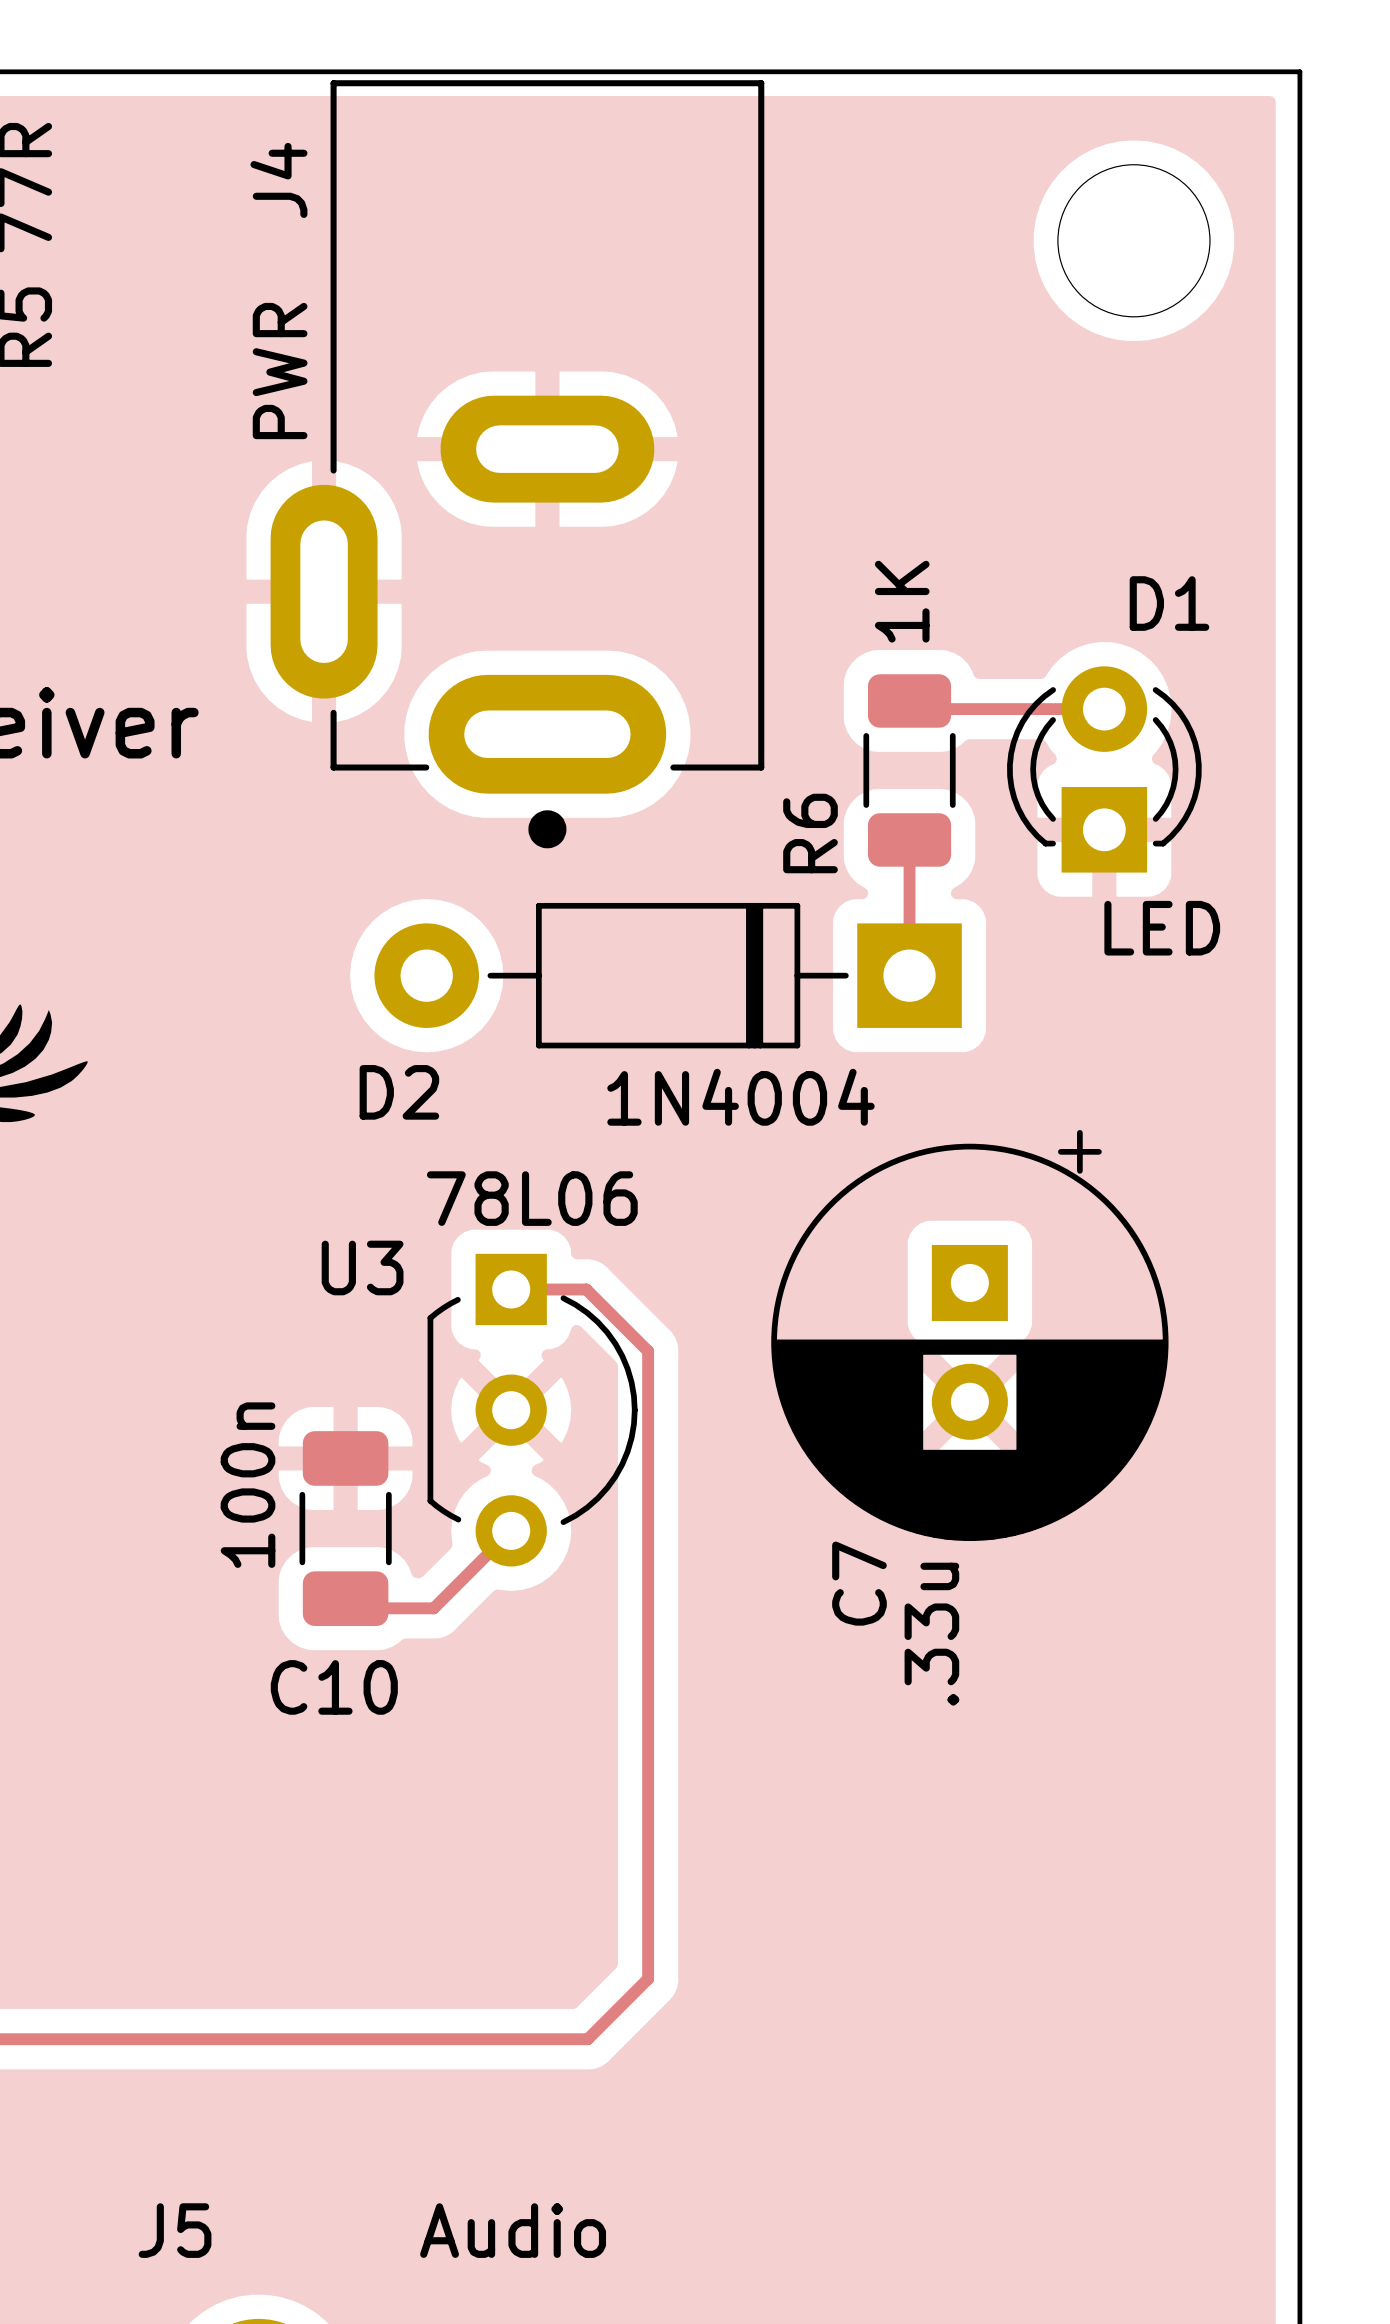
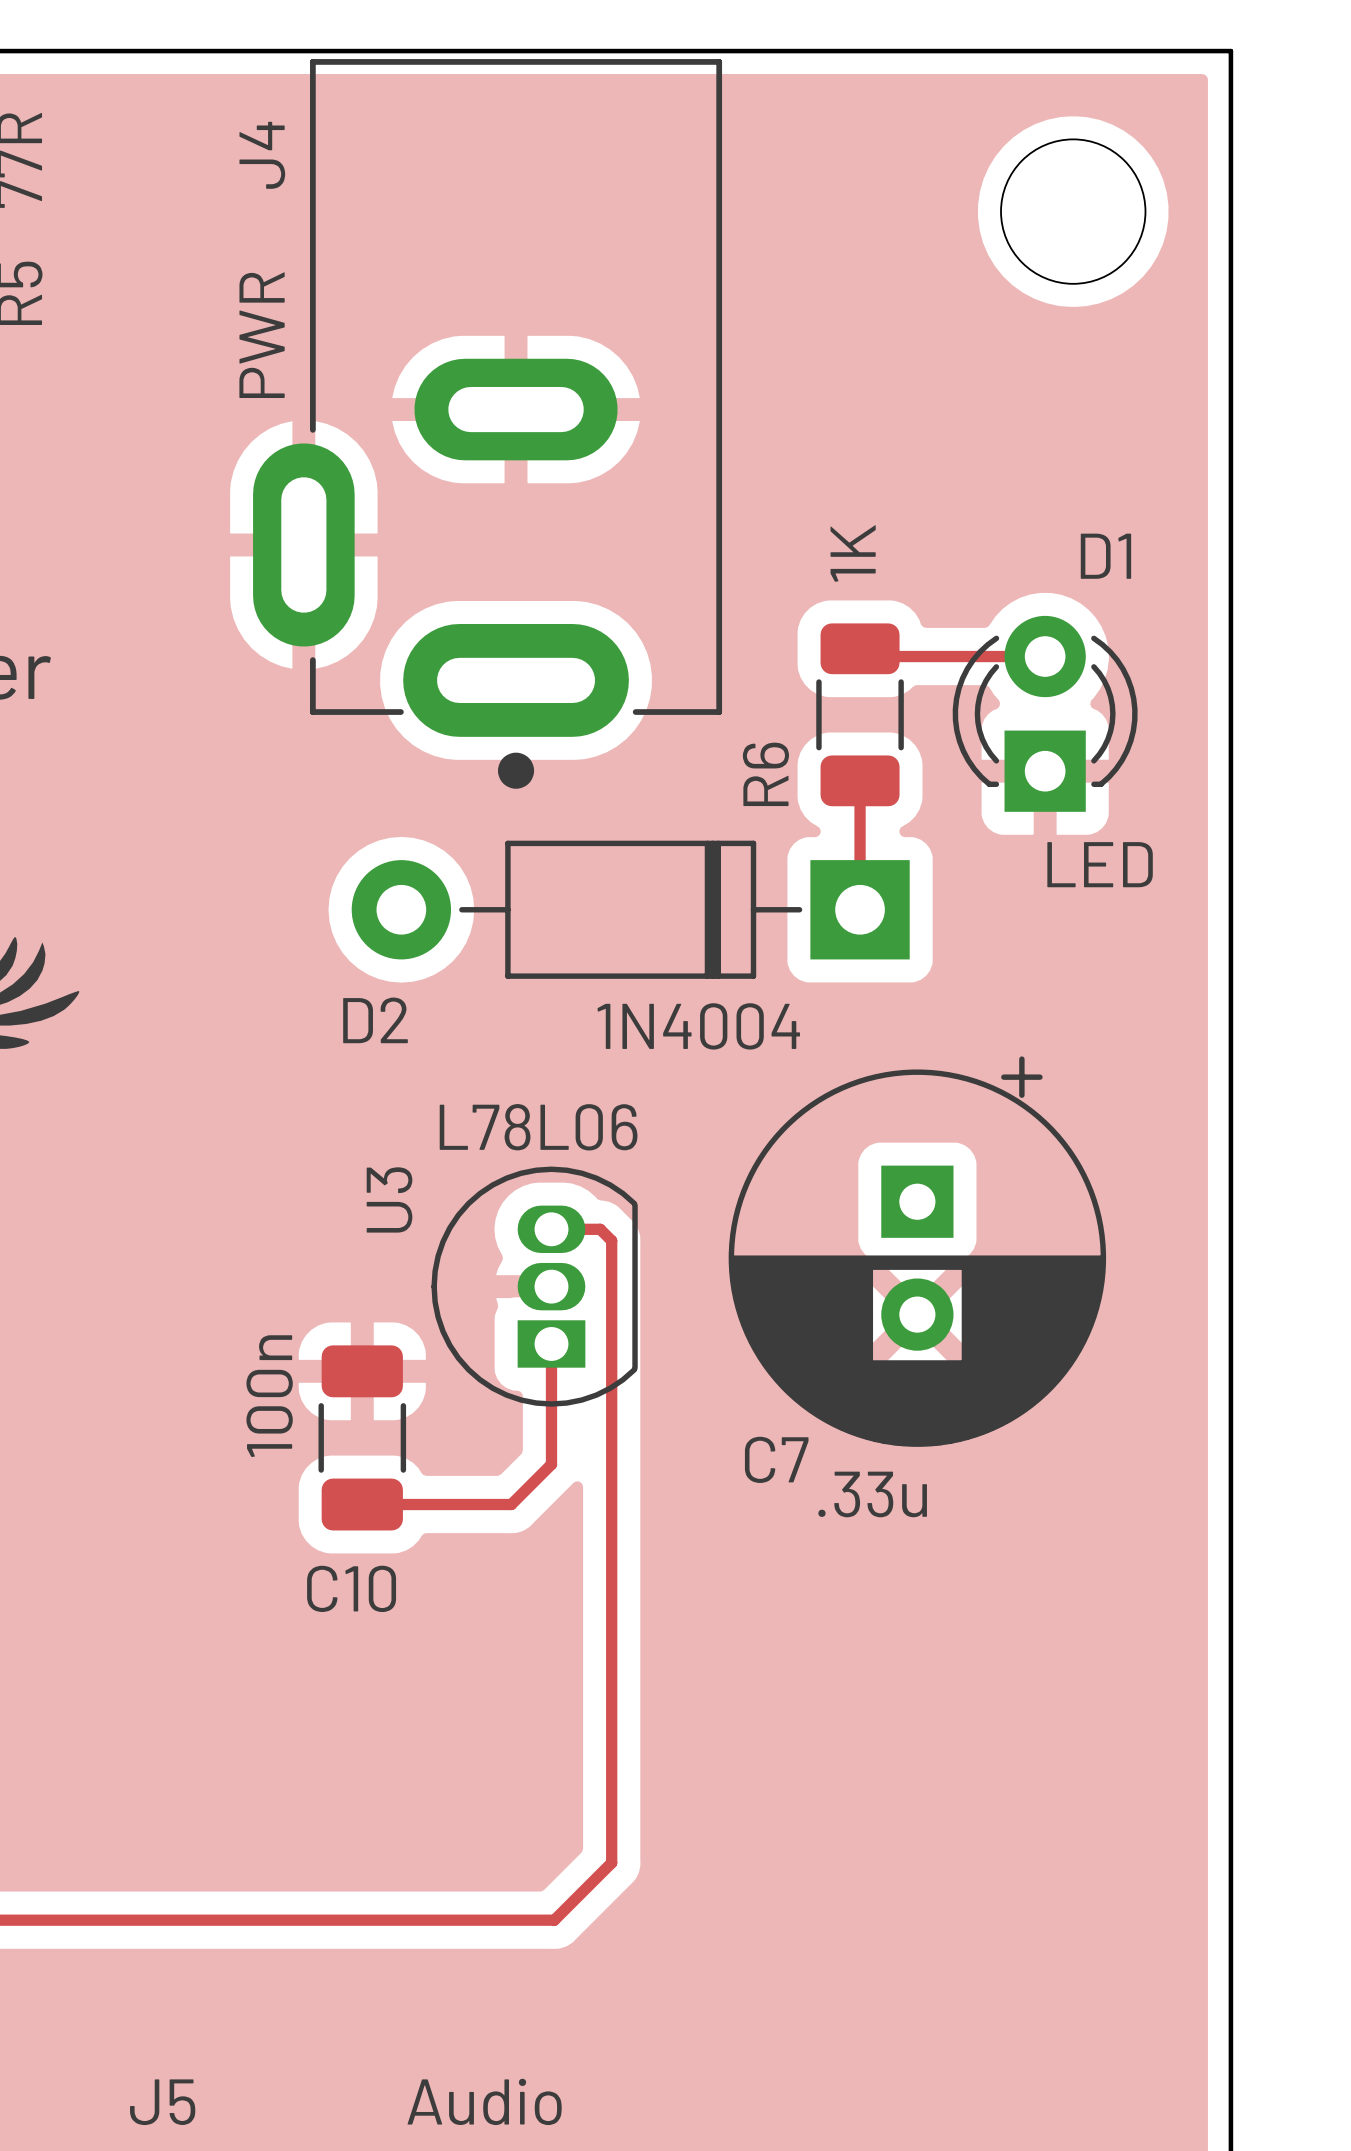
U3 value: 78L06 (532, 1198) -> L78L06 (538, 1127)
U3 footprint: [427, 1253, 638, 1567] -> [431, 1166, 638, 1407]
track: (511, 1289) (586, 1289) (648, 1351) -> (551, 1229) (600, 1229) (611, 1240) (611, 1266)
track: none -> (551, 1343) (551, 1464) (511, 1504) (362, 1504)
C10 position: (345, 1528) -> (362, 1437)
track: (511, 1530) (433, 1608) (355, 1608) -> none
C7 name rotation: 0° (859, 1583) -> 90° clockwise (776, 1459)
C7 value rotation: 0° (931, 1634) -> 90° clockwise (872, 1494)

